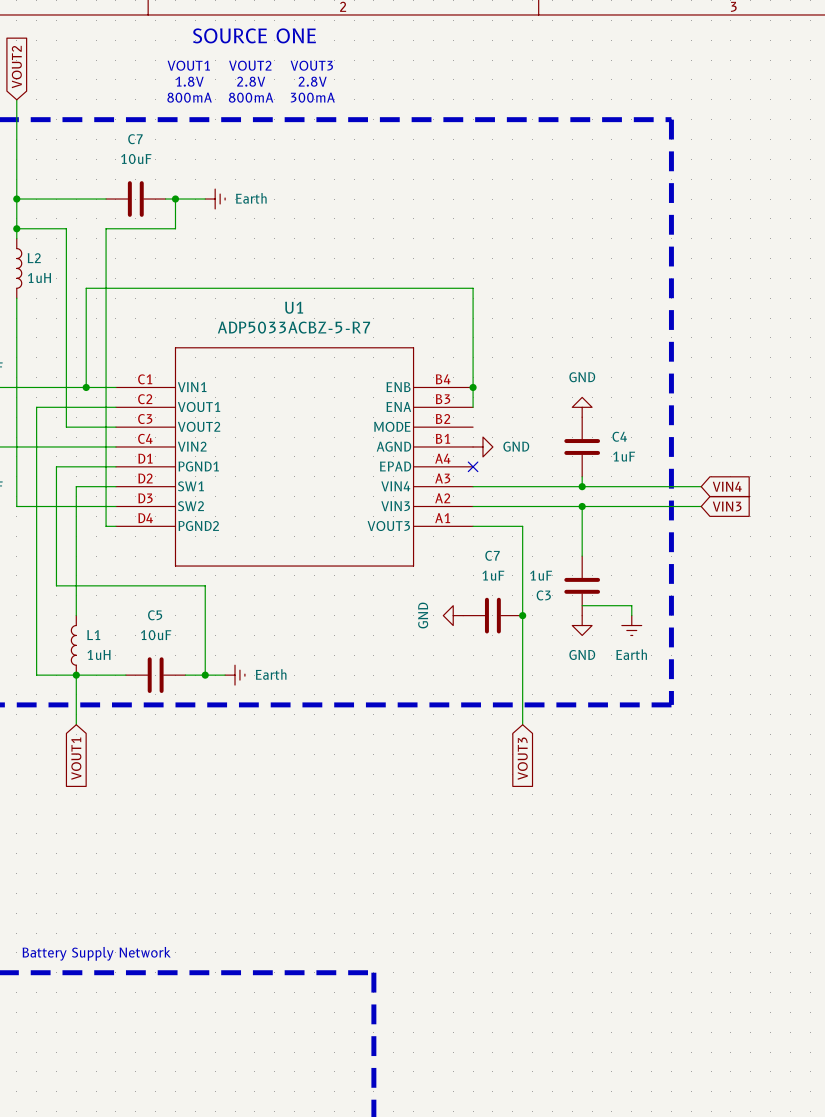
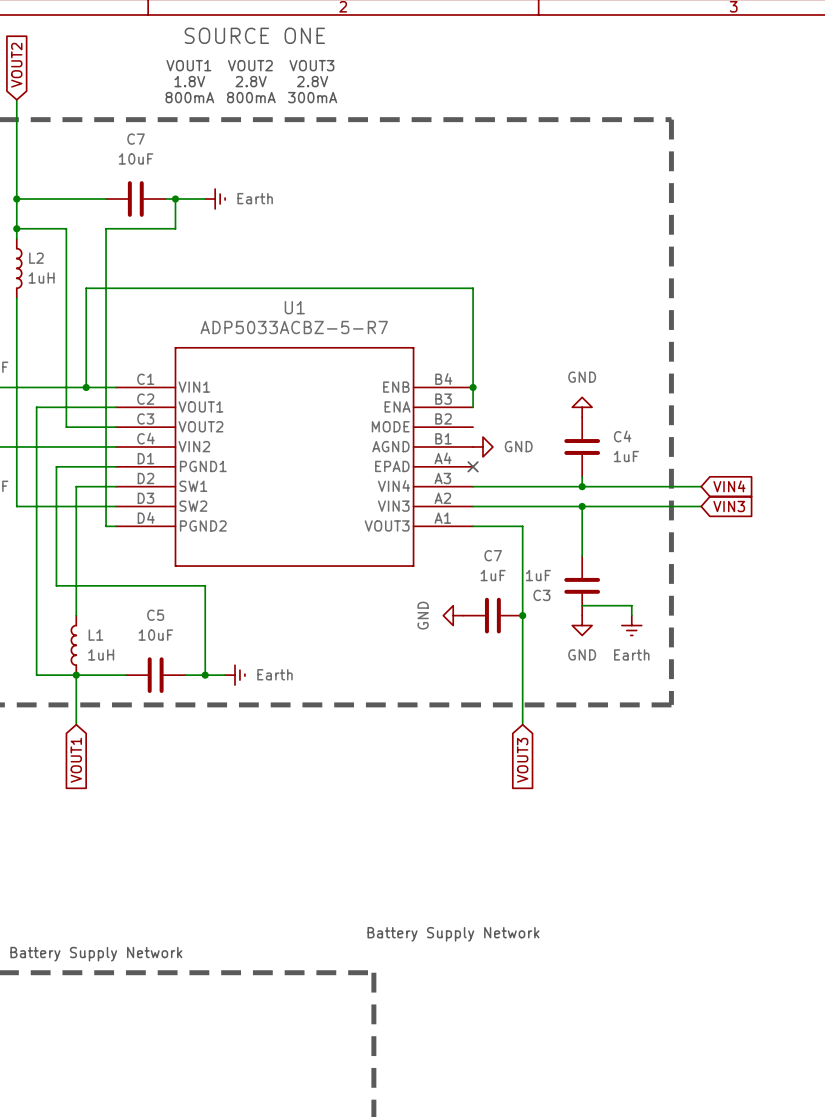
text: none -> Battery Supply Network (453, 934)

